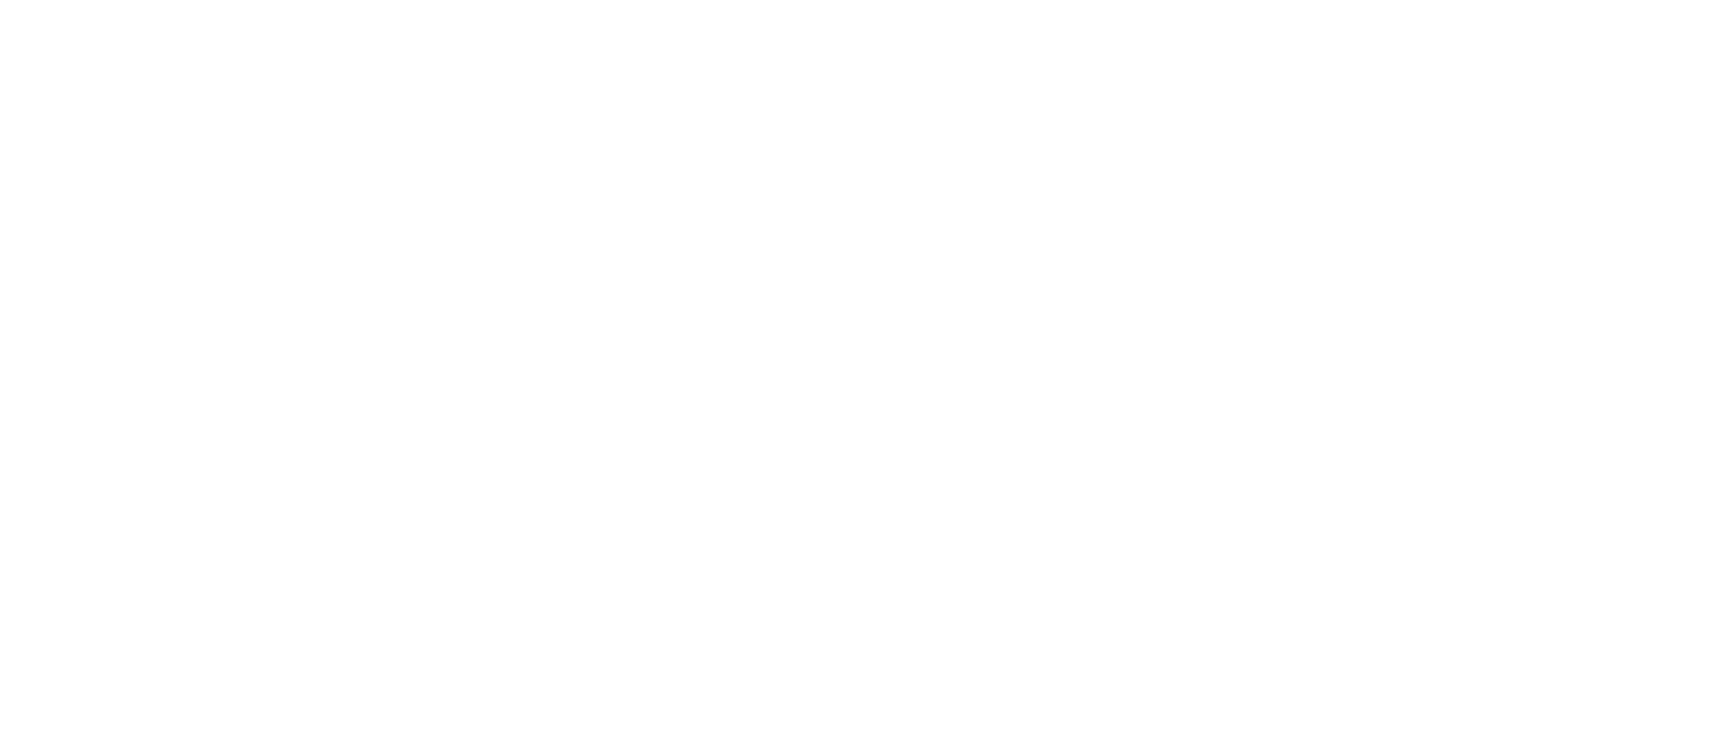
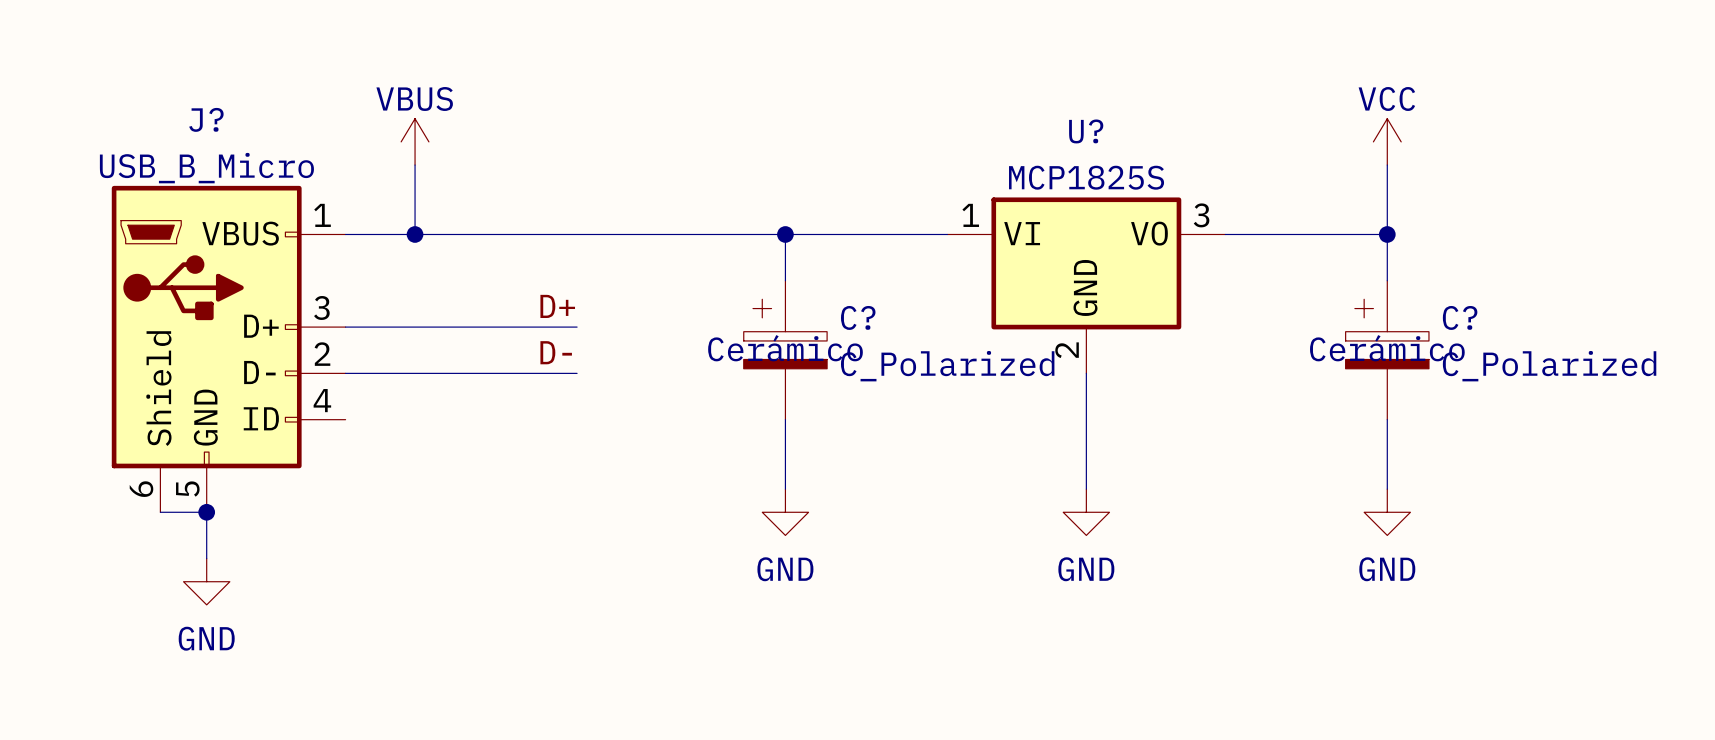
power symbol: none -> VBUS (415, 141)
power symbol: none -> VCC (1387, 141)
wire: none -> (415, 165) (415, 234)
wire: none -> (1387, 165) (1387, 280)
wire: none -> (345, 234) (947, 234)
junction: none -> (415, 234)
wire: none -> (785, 234) (785, 280)
junction: none -> (785, 234)
wire: none -> (1225, 234) (1387, 234)
junction: none -> (1387, 234)
U?: none -> MCP1825S (1086, 285)
label: none -> D+ (557, 306)
wire: none -> (345, 327) (577, 327)
J?: none -> USB_B_Micro (228, 349)
C?: none -> C_Polarized (785, 350)
C?: none -> C_Polarized (1387, 350)
label: none -> D- (556, 352)
wire: none -> (345, 373) (577, 373)
wire: none -> (1086, 373) (1086, 489)
wire: none -> (785, 419) (785, 489)
wire: none -> (1387, 419) (1387, 489)
wire: none -> (160, 512) (206, 512) (206, 558)
junction: none -> (206, 512)
power symbol: none -> GND (785, 512)
power symbol: none -> GND (1086, 512)
power symbol: none -> GND (1387, 512)
power symbol: none -> GND (206, 581)

